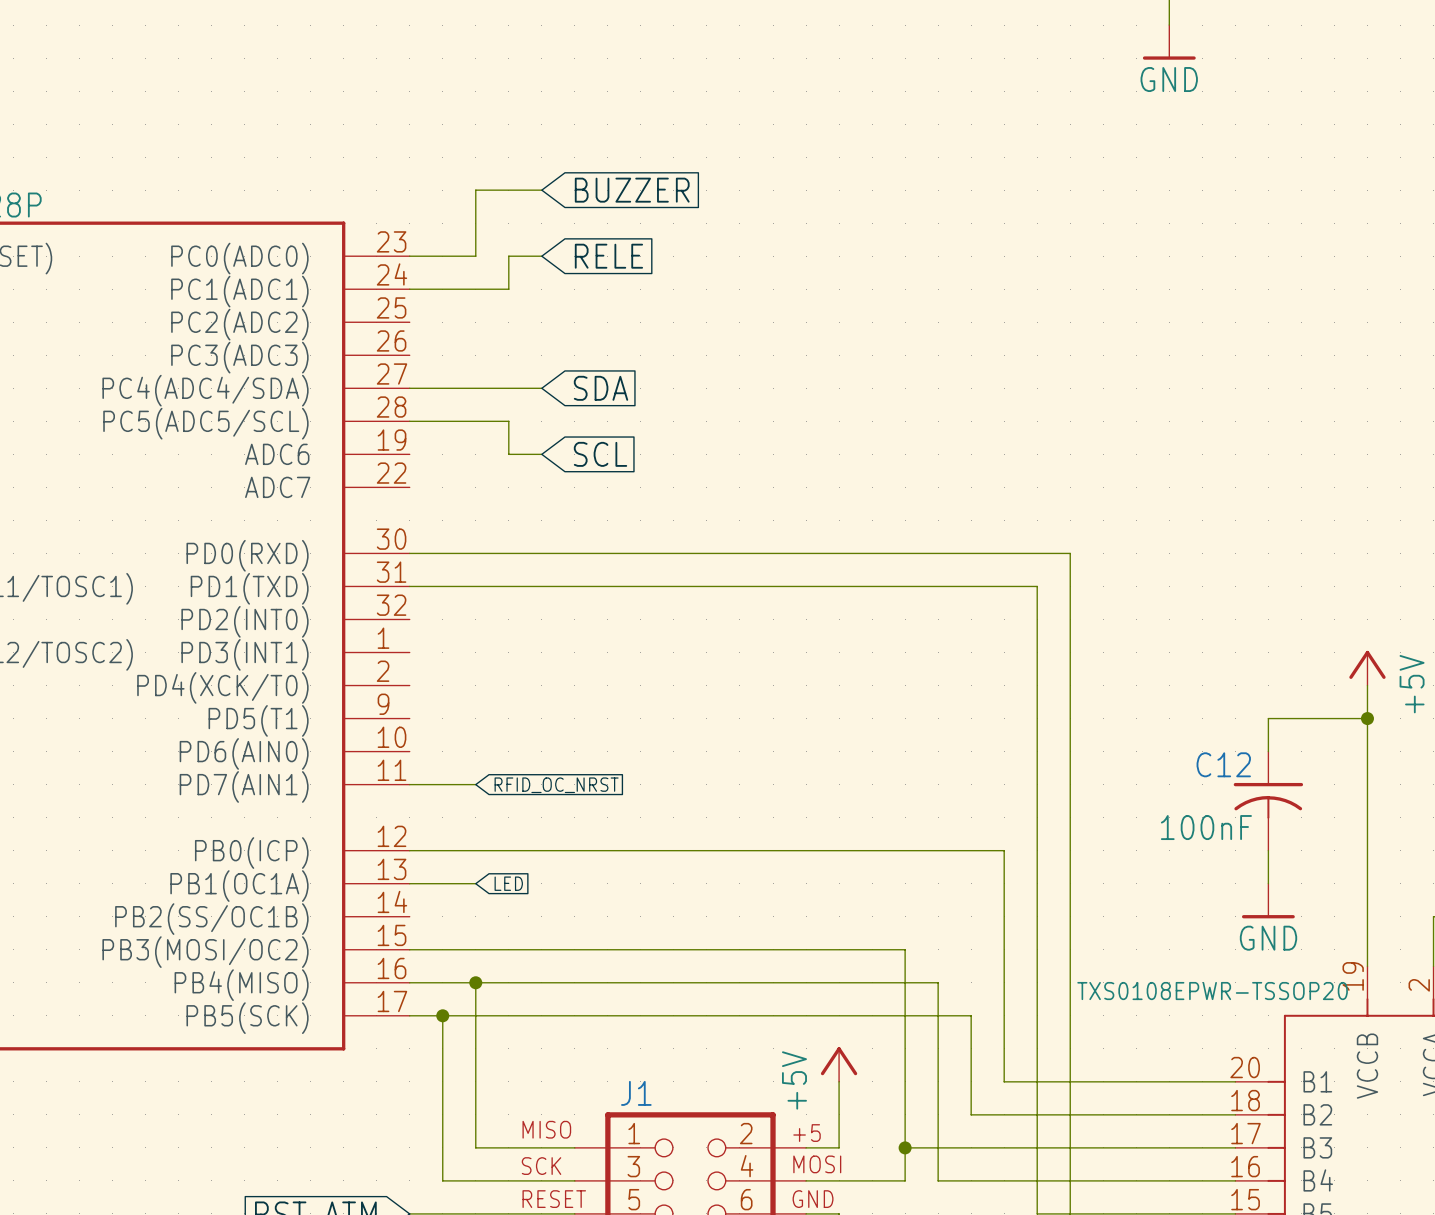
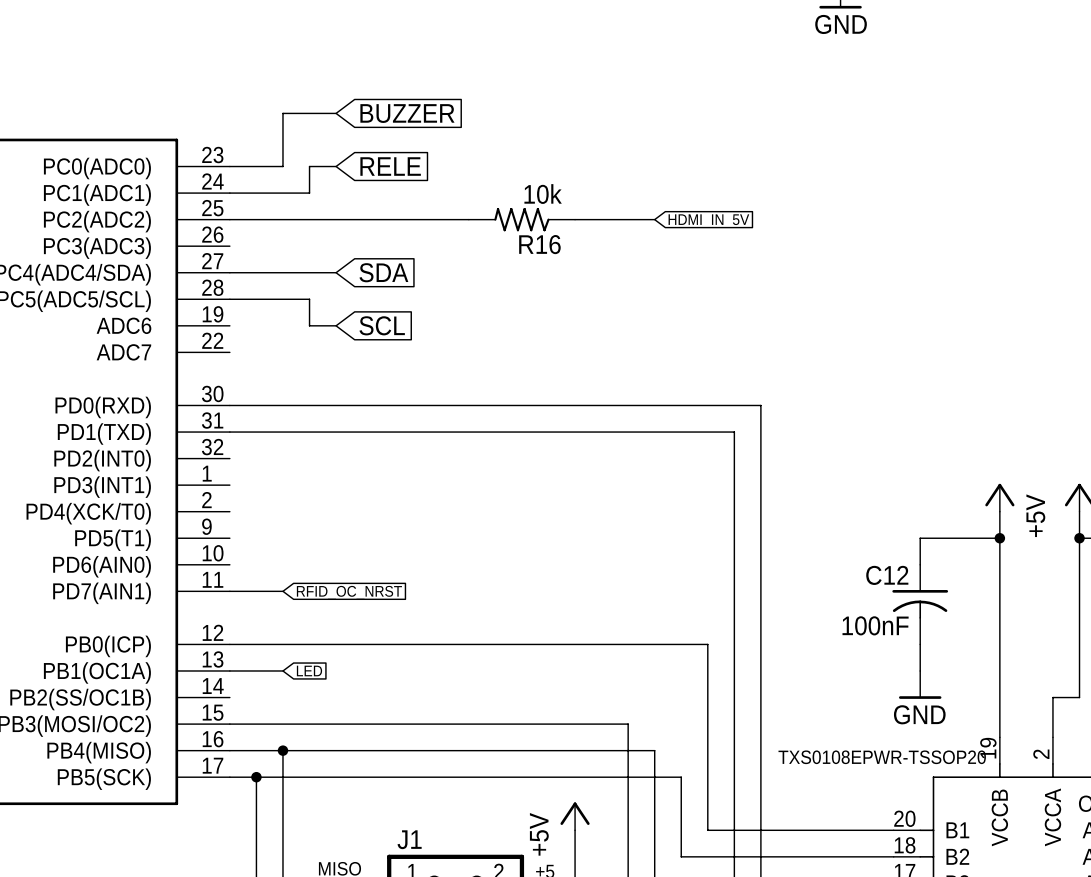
wire: none -> (229, 219) (468, 219)
R16: none -> 10k (521, 219)
wire: none -> (575, 219) (654, 219)
global label: none -> HDMI_IN_5V (708, 221)

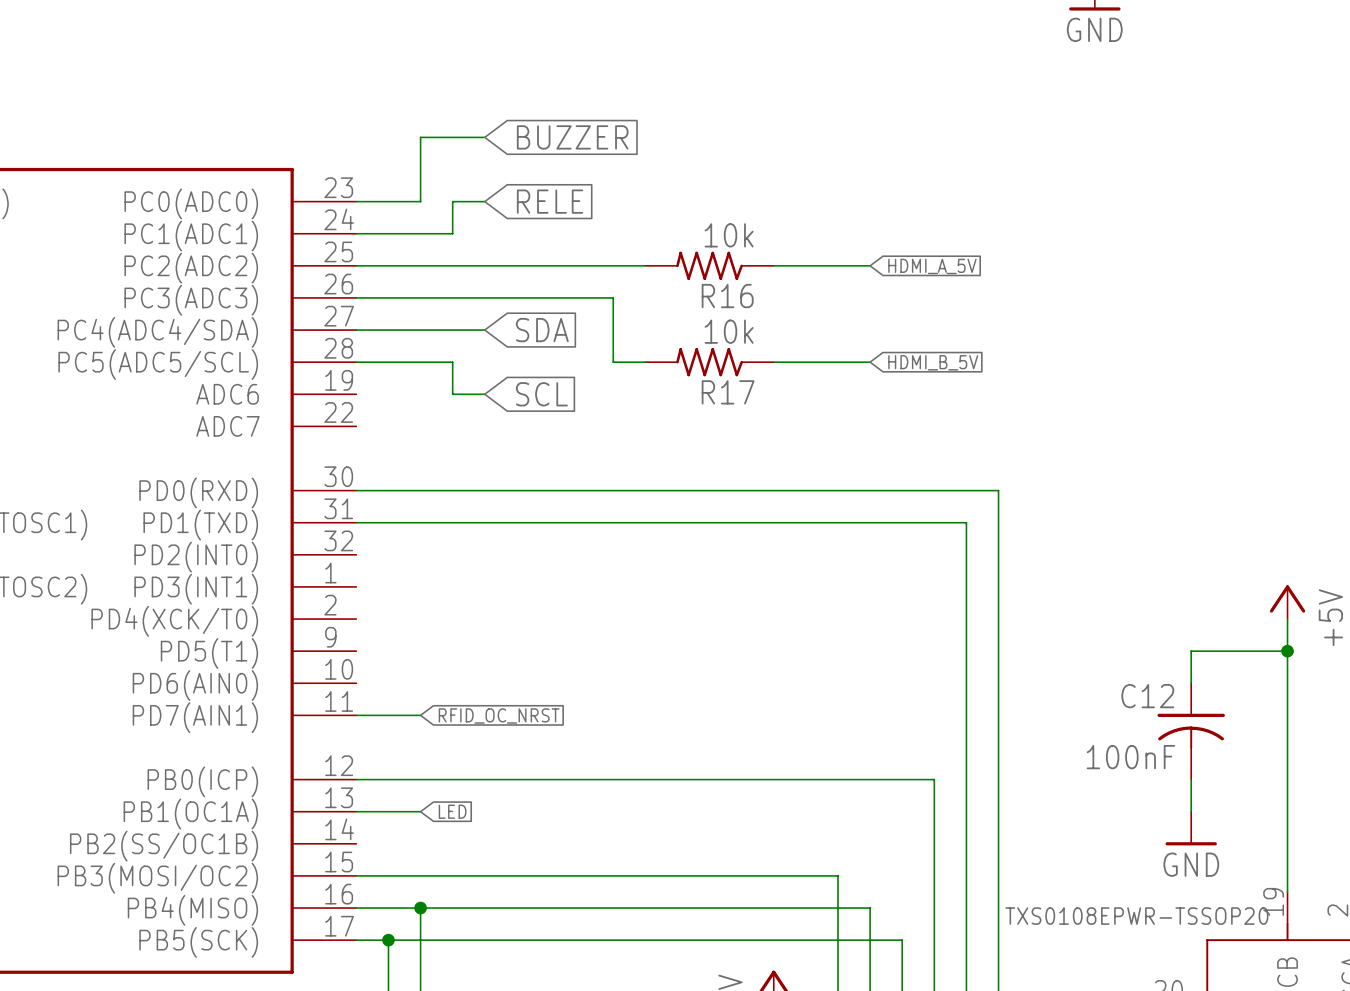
global label: HDMI_IN_5V (708, 221) -> HDMI_A_5V (932, 266)
wire: none -> (356, 297) (613, 297) (613, 362) (645, 362)
R17: none -> 10k (709, 362)
wire: none -> (773, 362) (870, 362)
global label: none -> HDMI_B_5V (933, 362)

